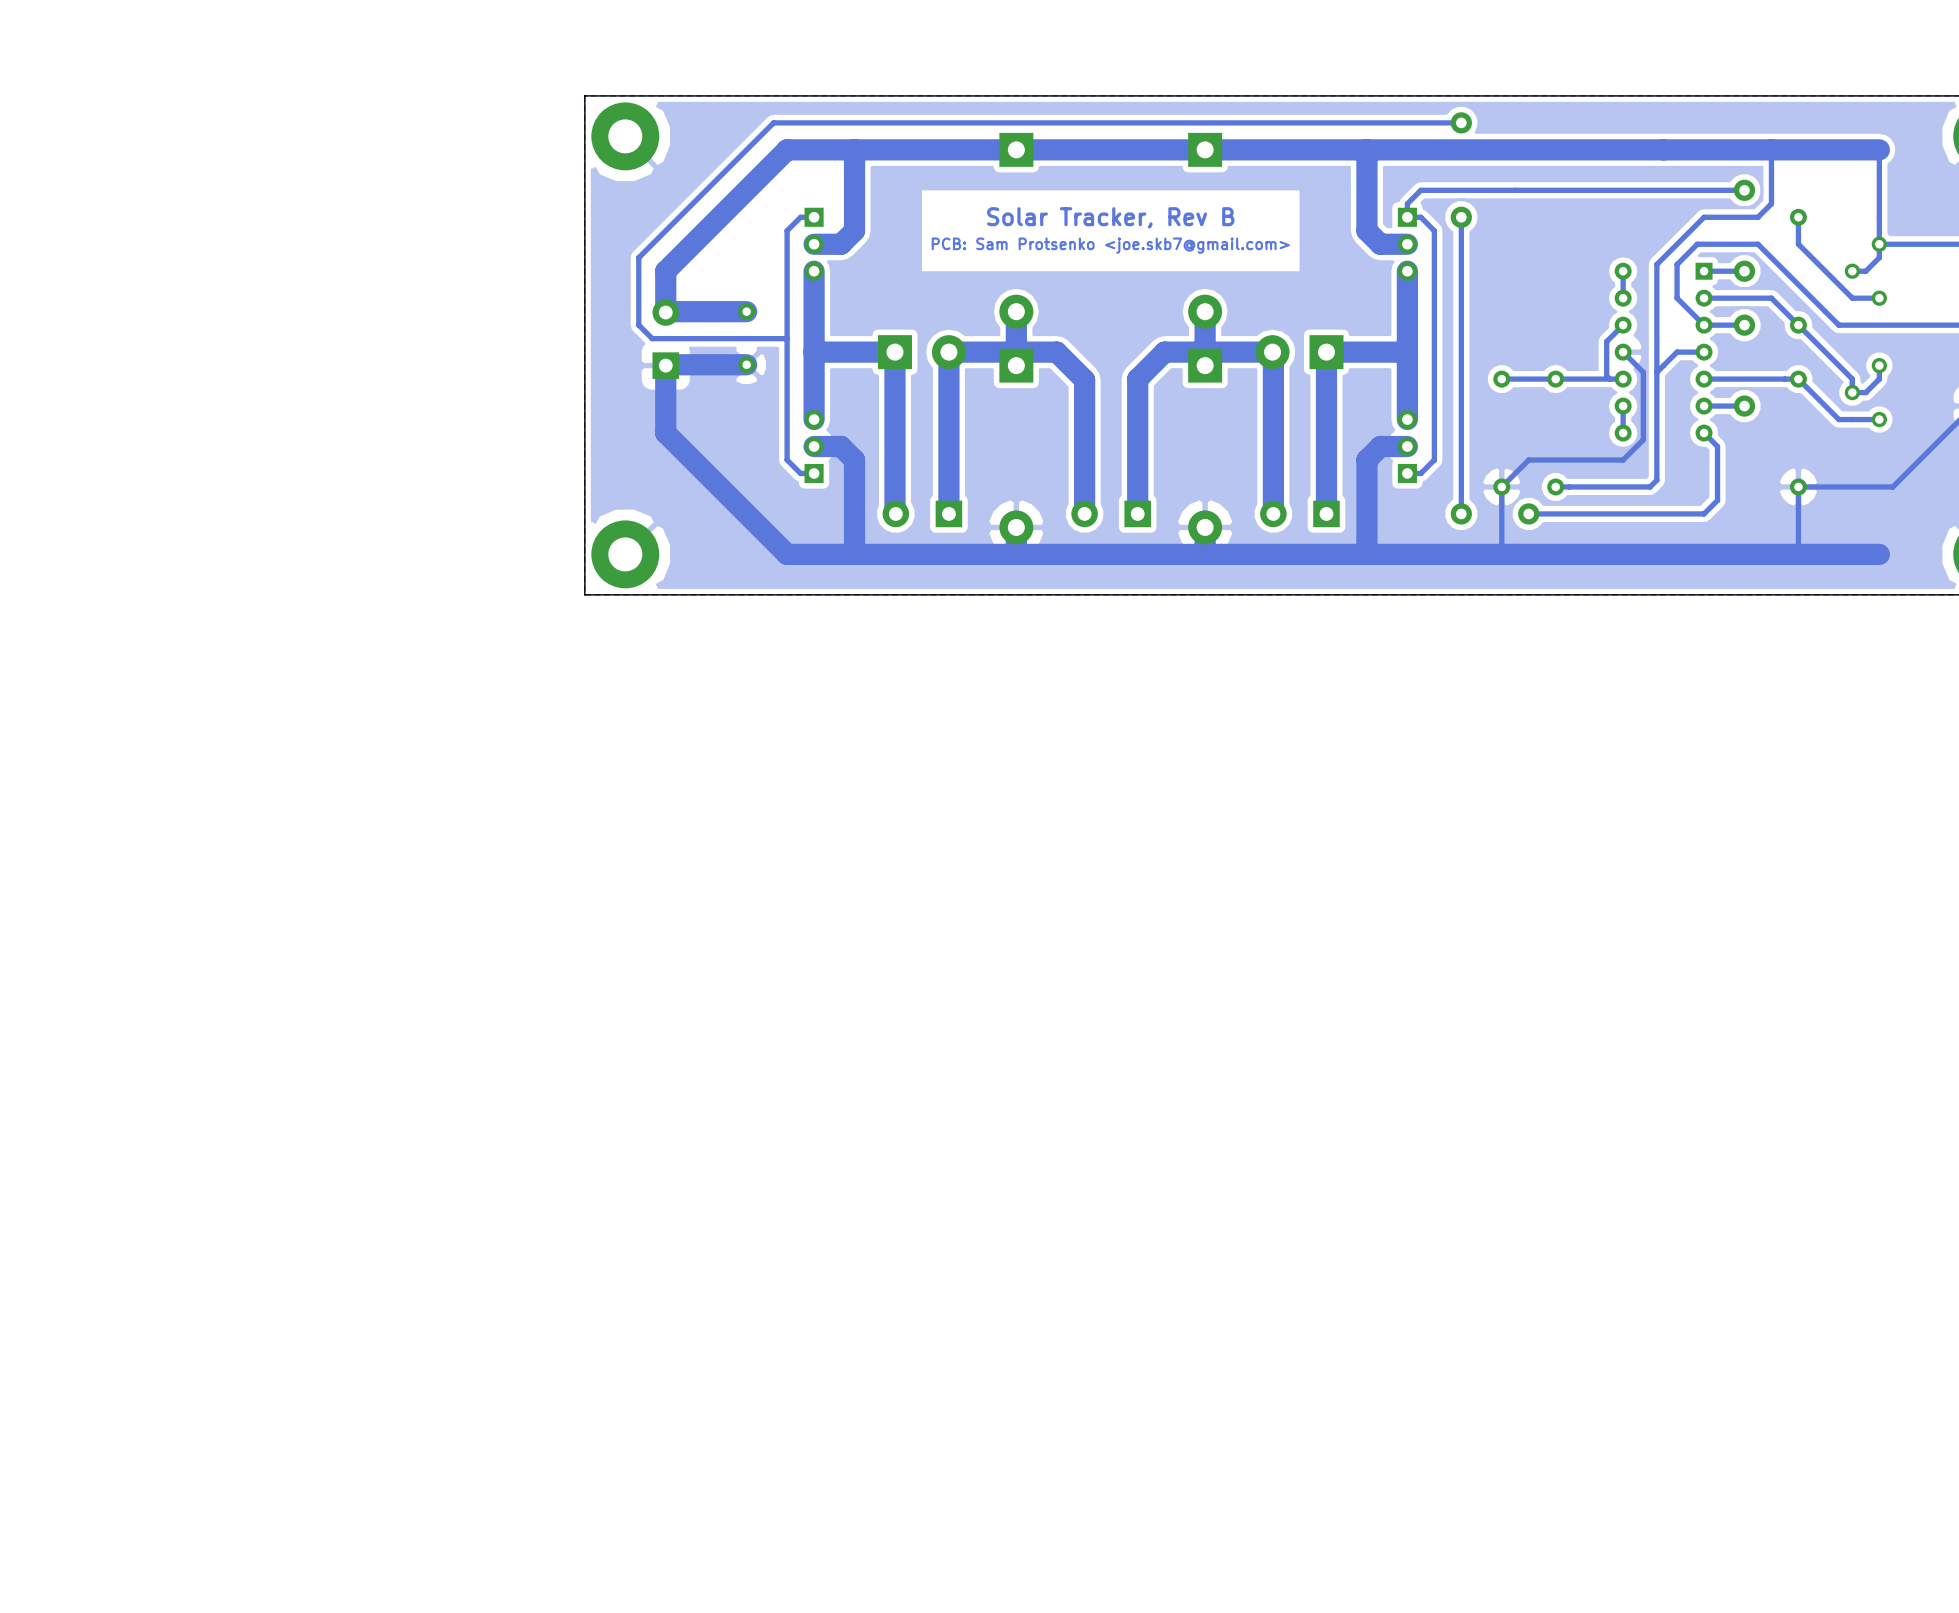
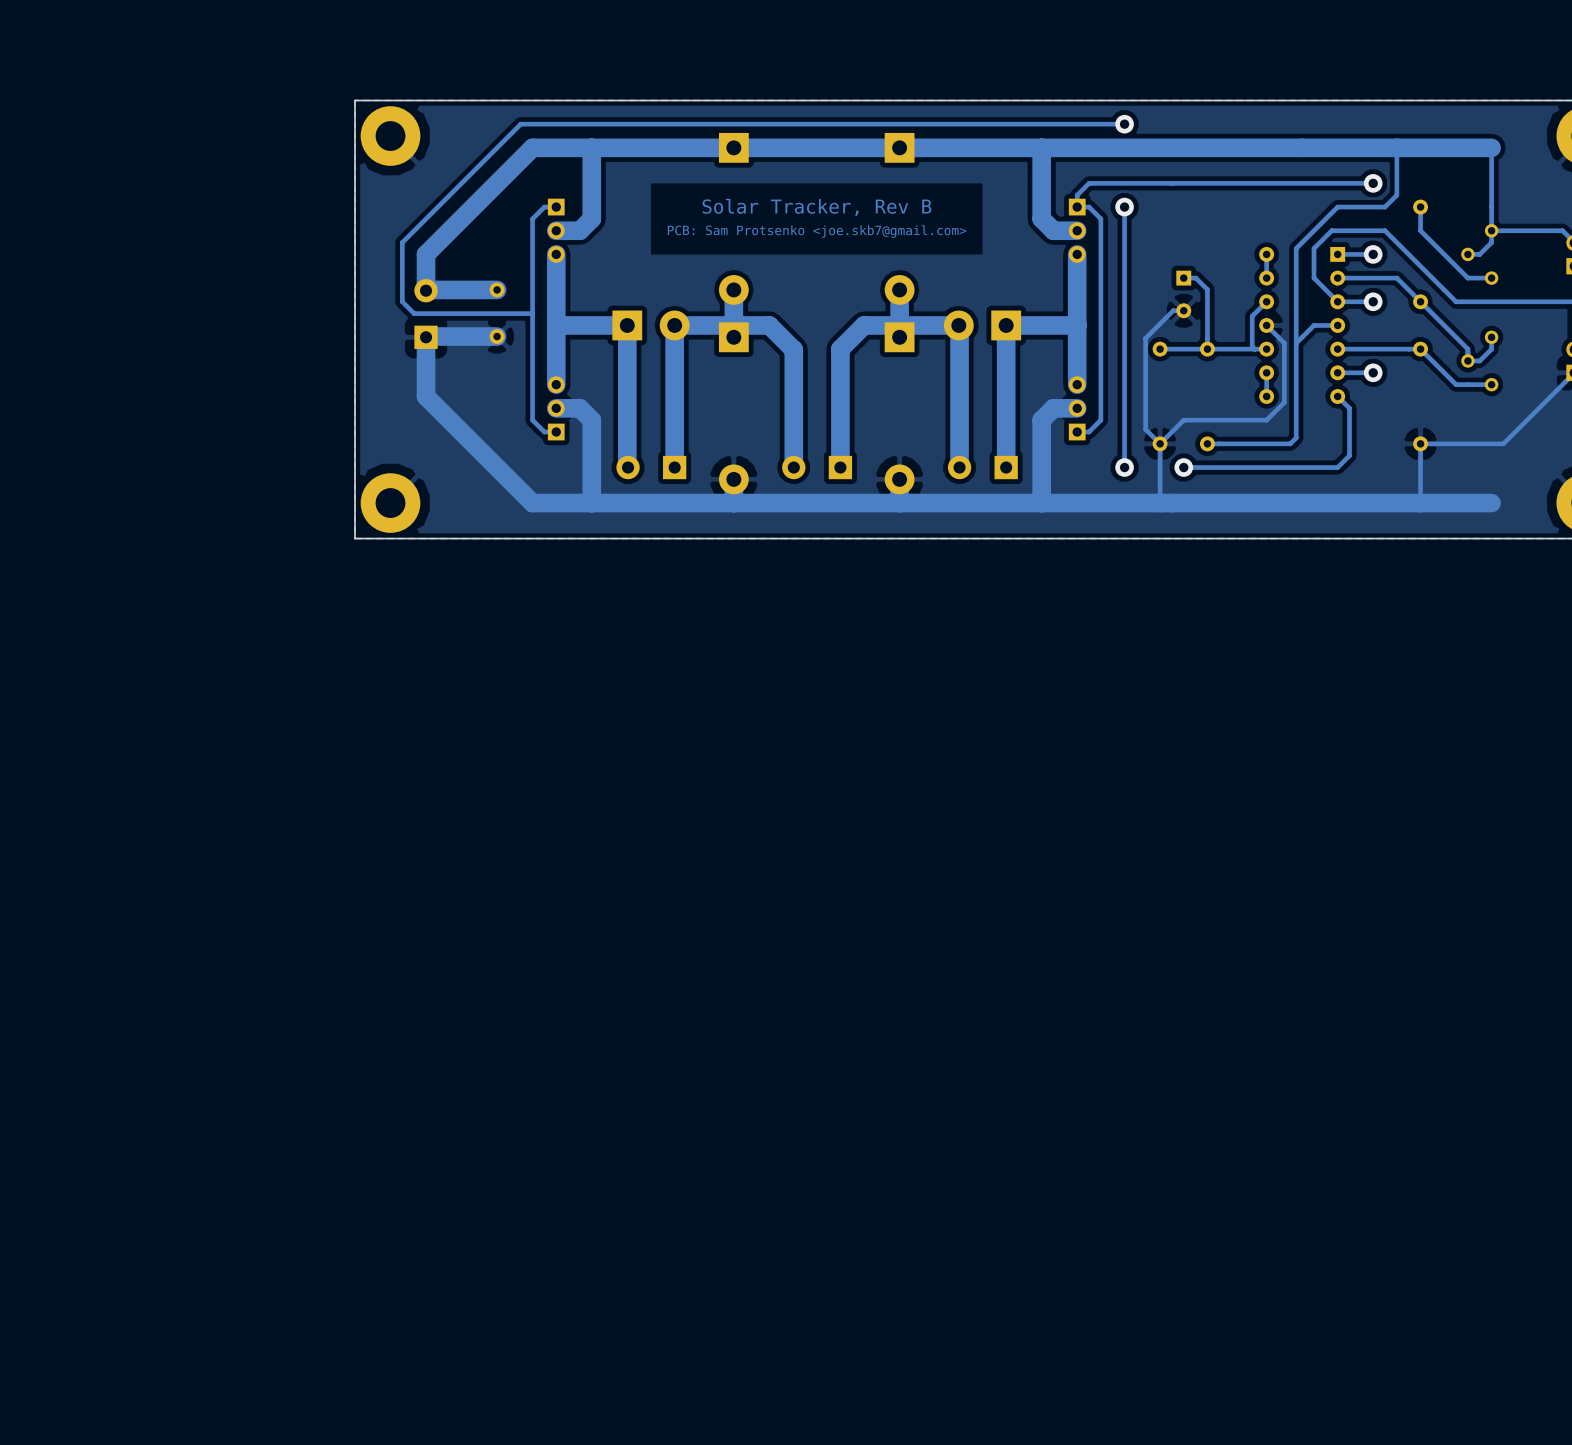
track: none -> (1183, 278) (1195, 278) (1207, 289) (1207, 349)
part: none -> (1183, 294)
track: none -> (1183, 310) (1173, 310) (1145, 338) (1145, 429) (1160, 443)

